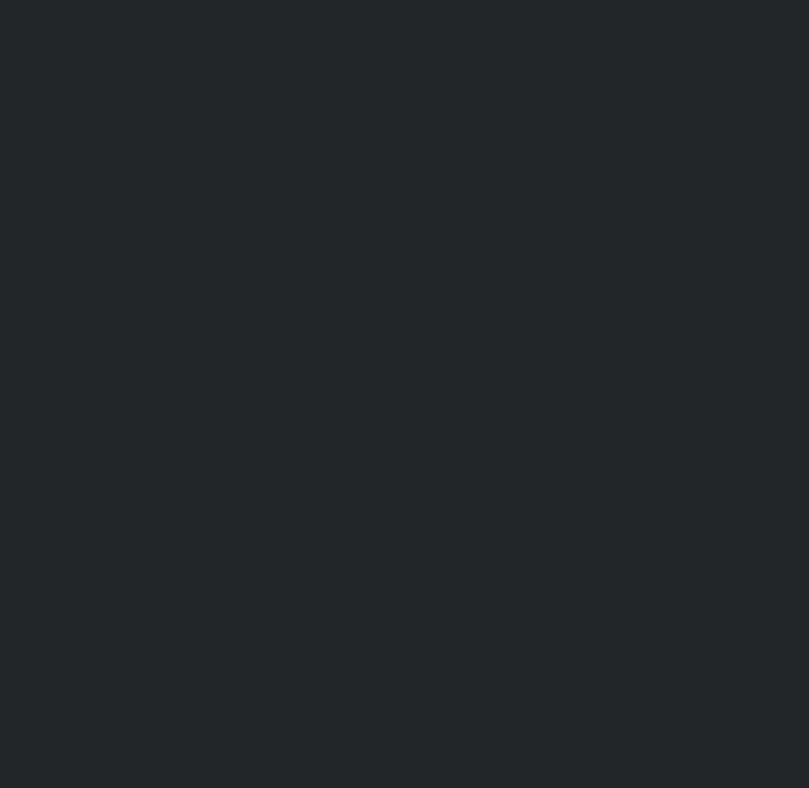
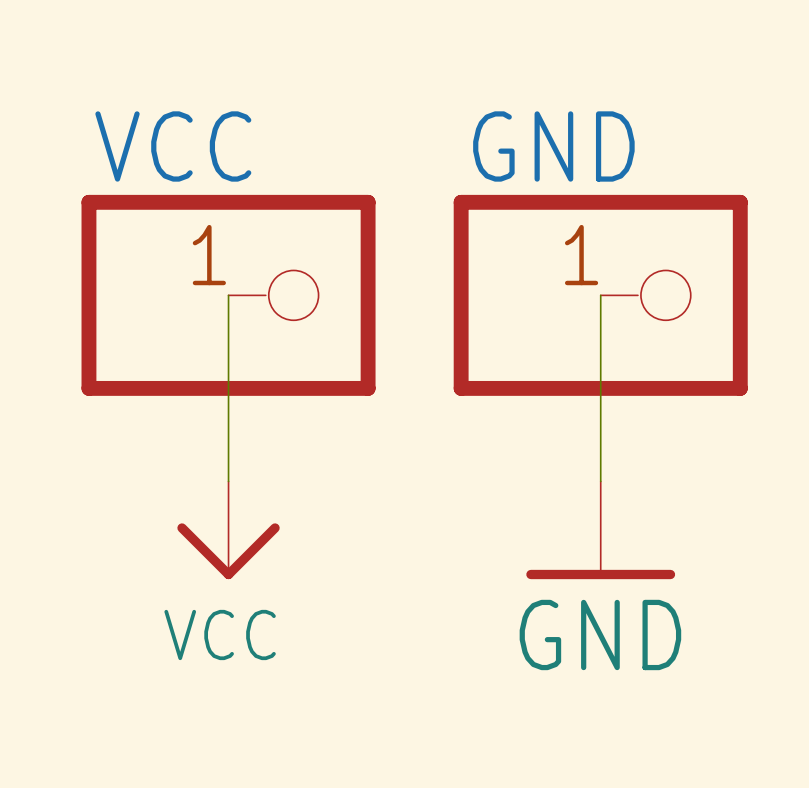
wire: none -> (228, 295) (228, 481)
VCC: none -> (228, 295)
wire: none -> (600, 295) (600, 481)
GND: none -> (600, 295)
power symbol: none -> VCC (228, 530)
power symbol: none -> GND (600, 530)

